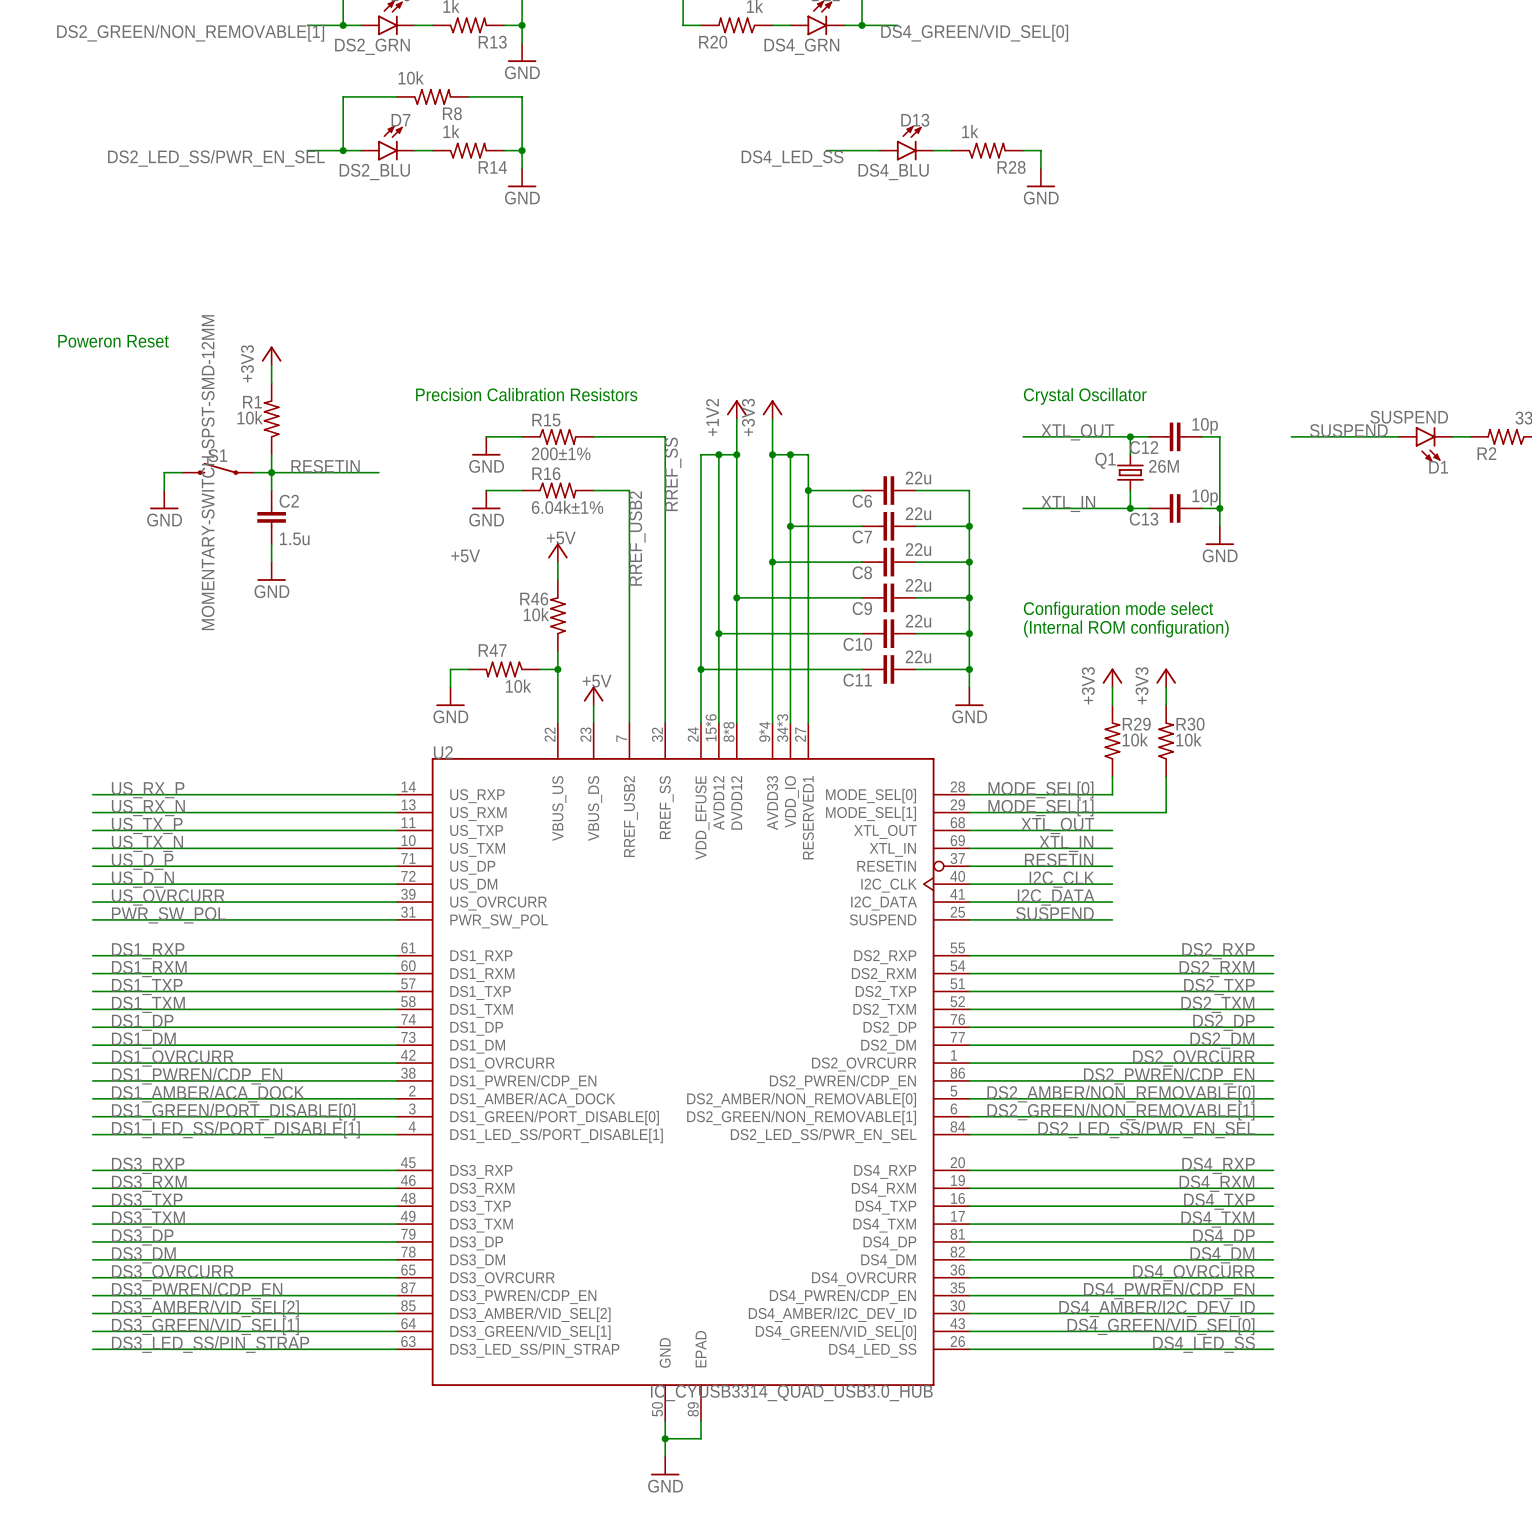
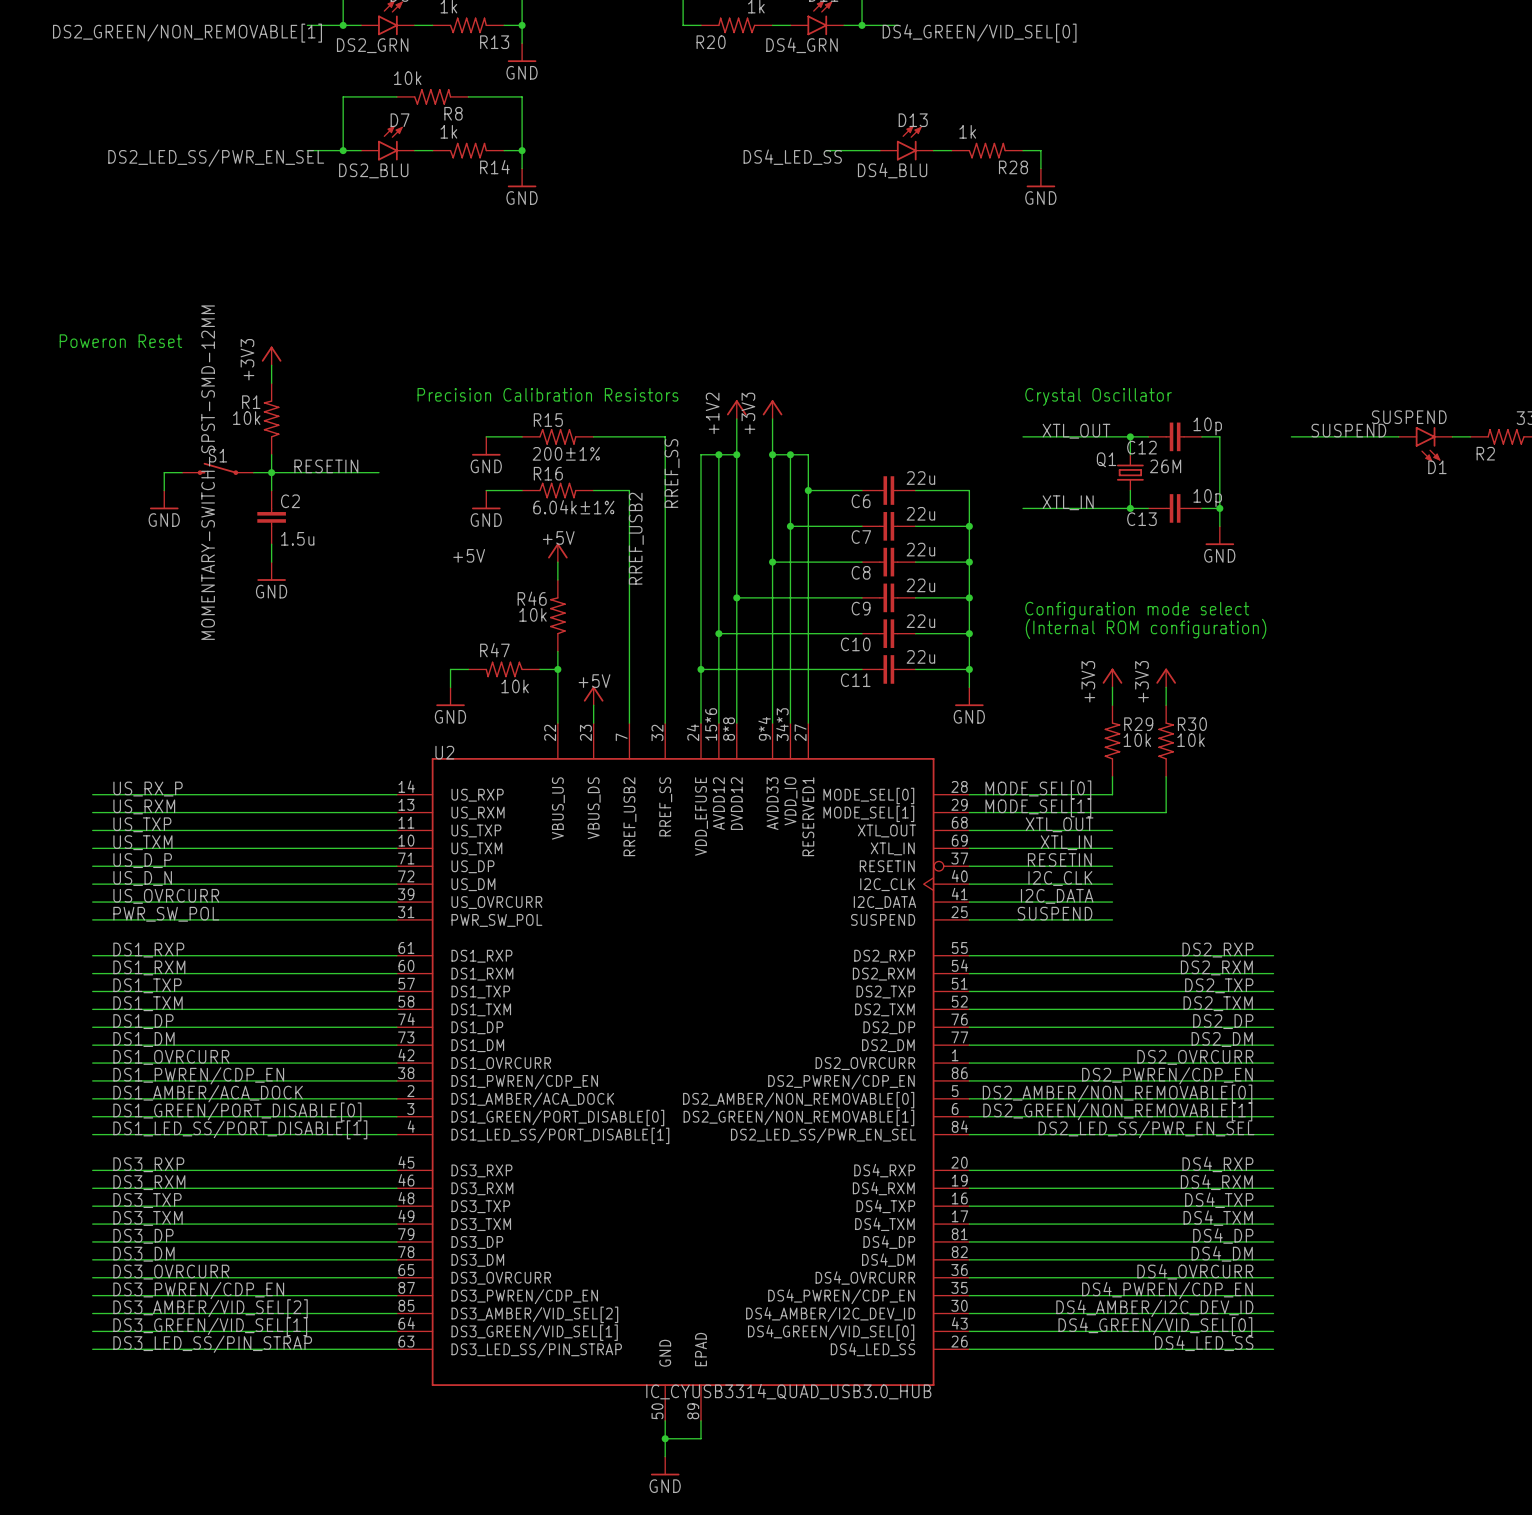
label: US_RX_N (148, 808) -> US_RXM (144, 806)
label: US_TX_P (147, 825) -> US_TXP (142, 824)
label: US_TX_N (147, 843) -> US_TXM (142, 842)

